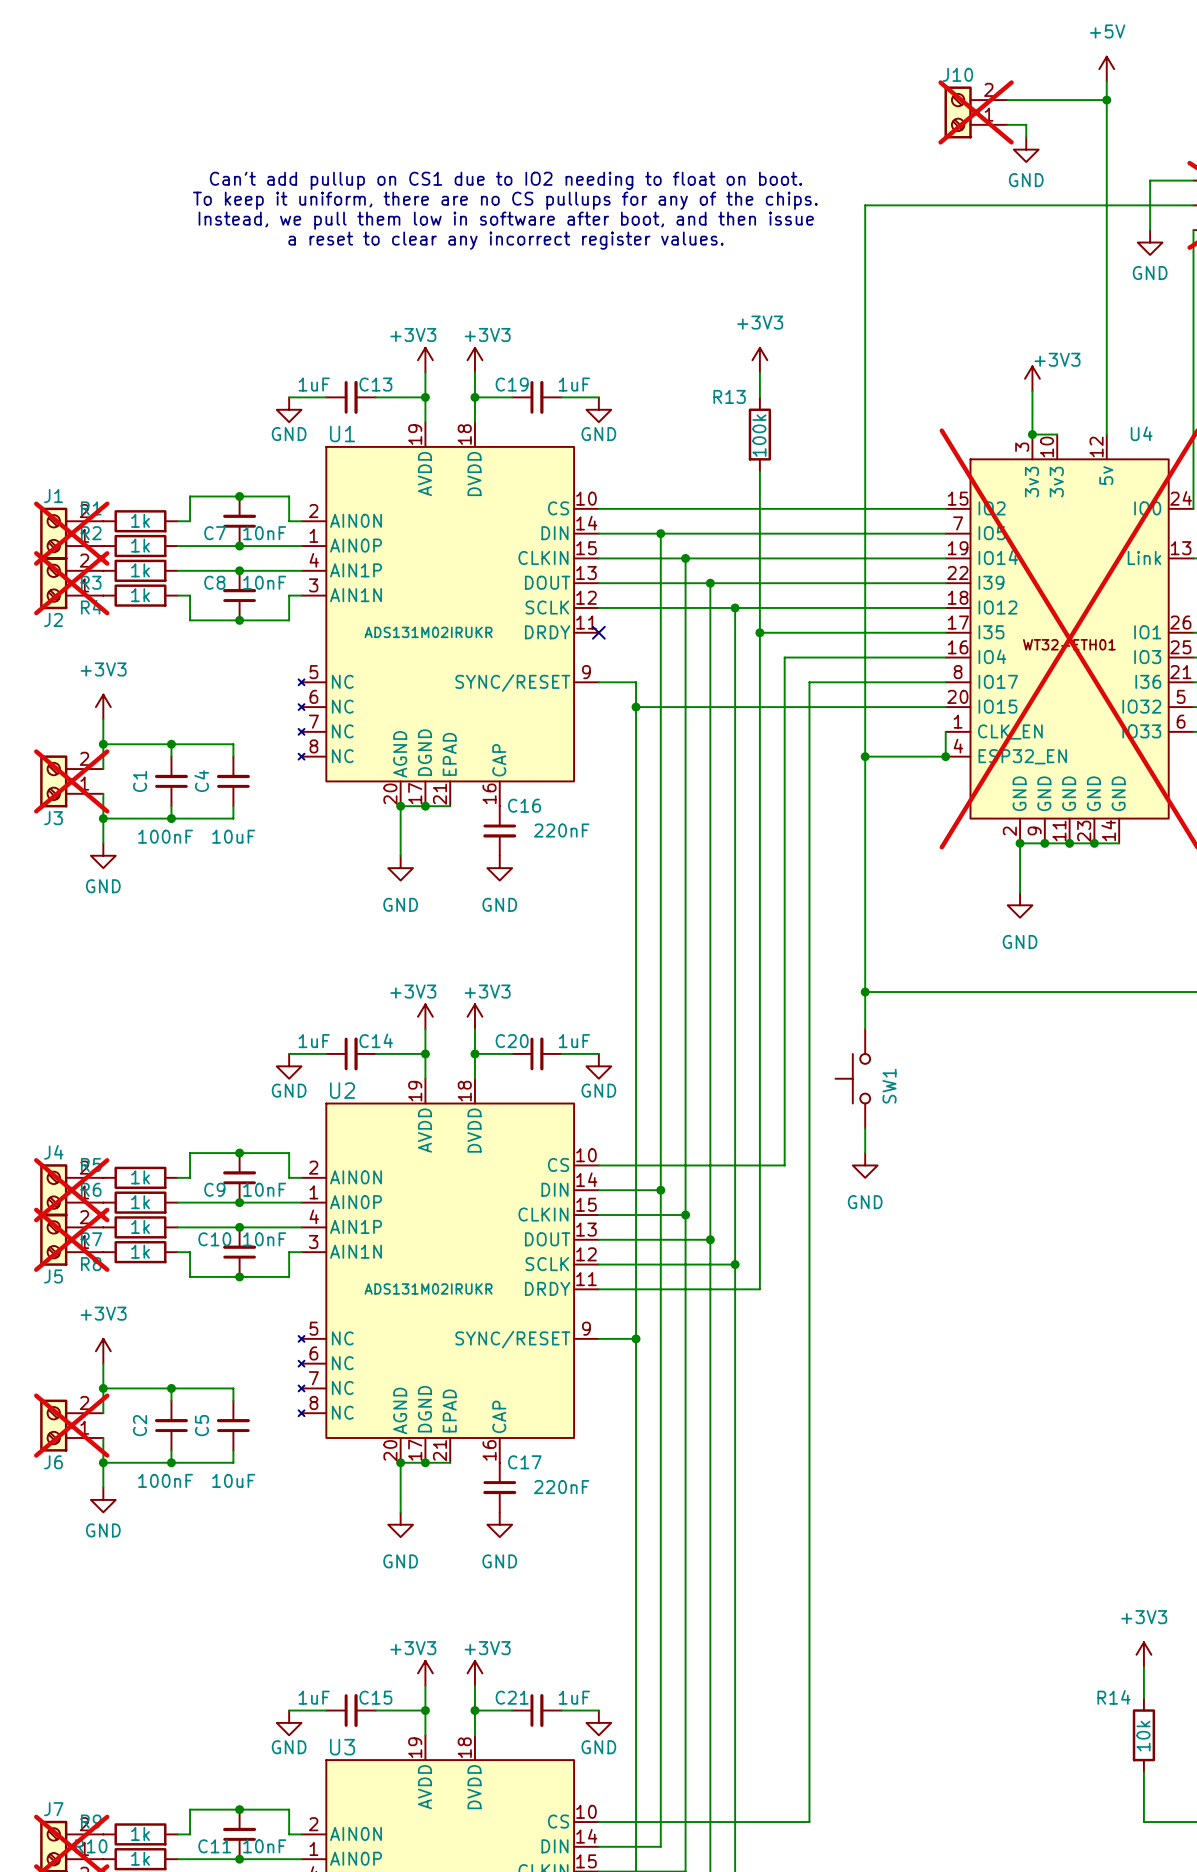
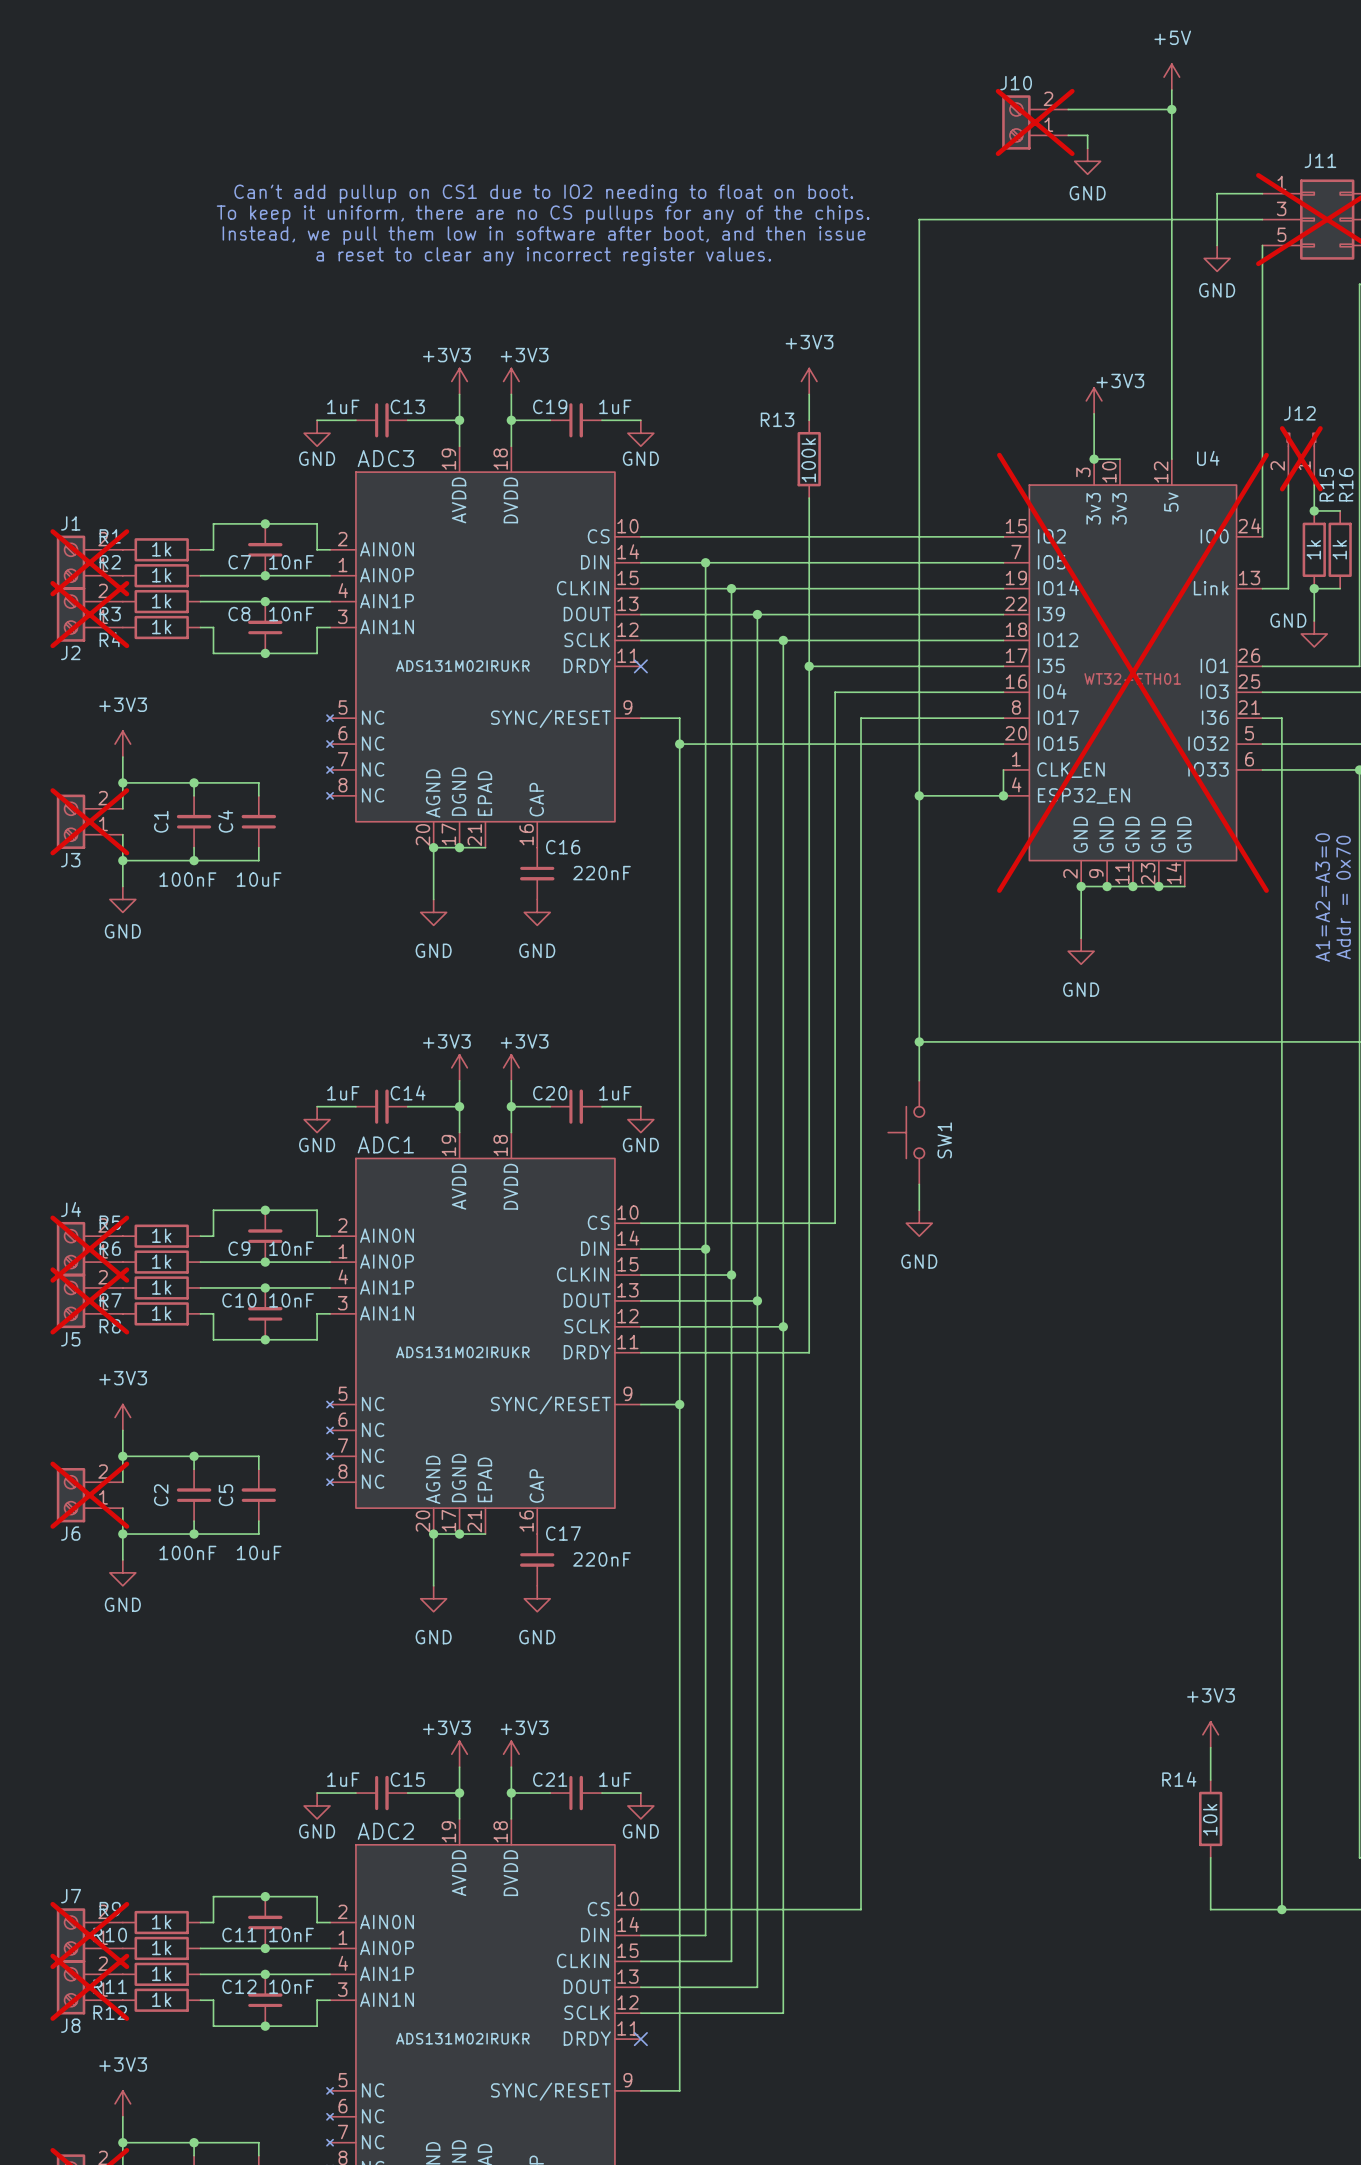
U1 name: U1 (342, 433) -> ADC3 (385, 458)
U2 name: U2 (342, 1090) -> ADC1 (385, 1144)
U3 name: U3 (342, 1747) -> ADC2 (385, 1831)

